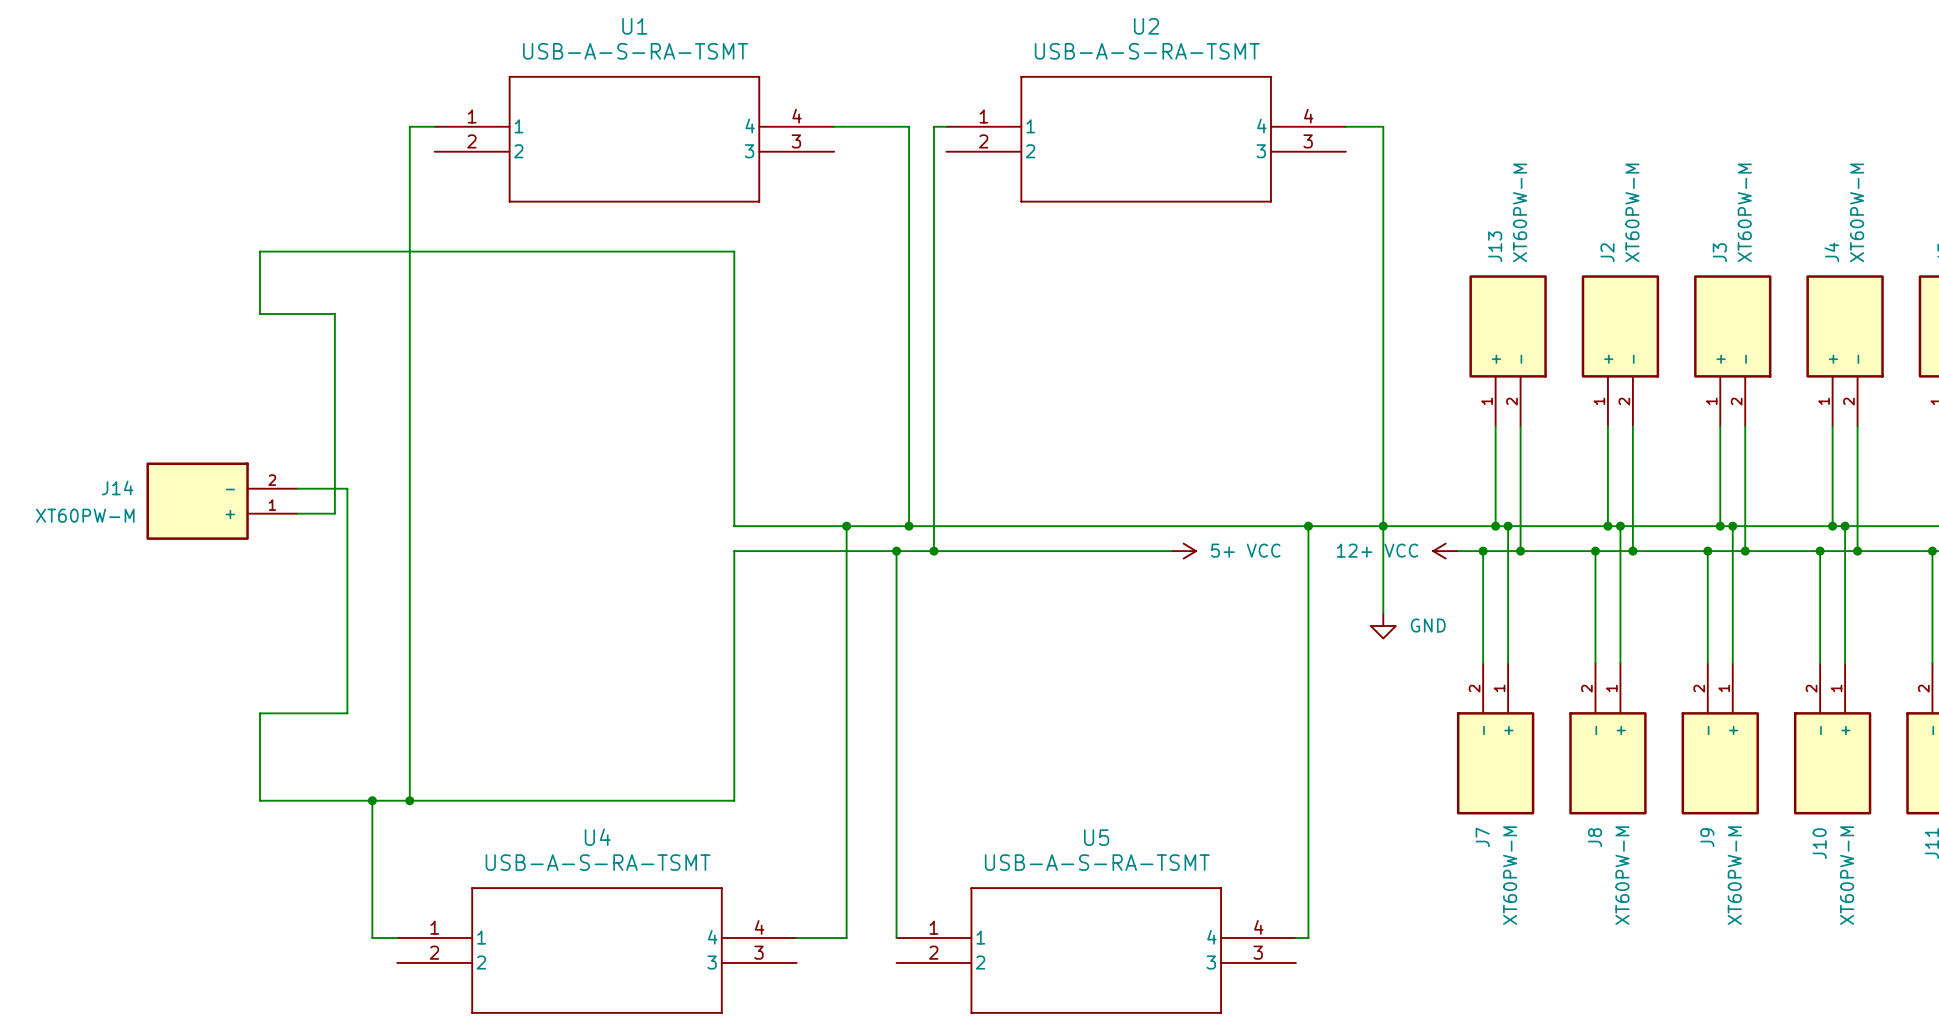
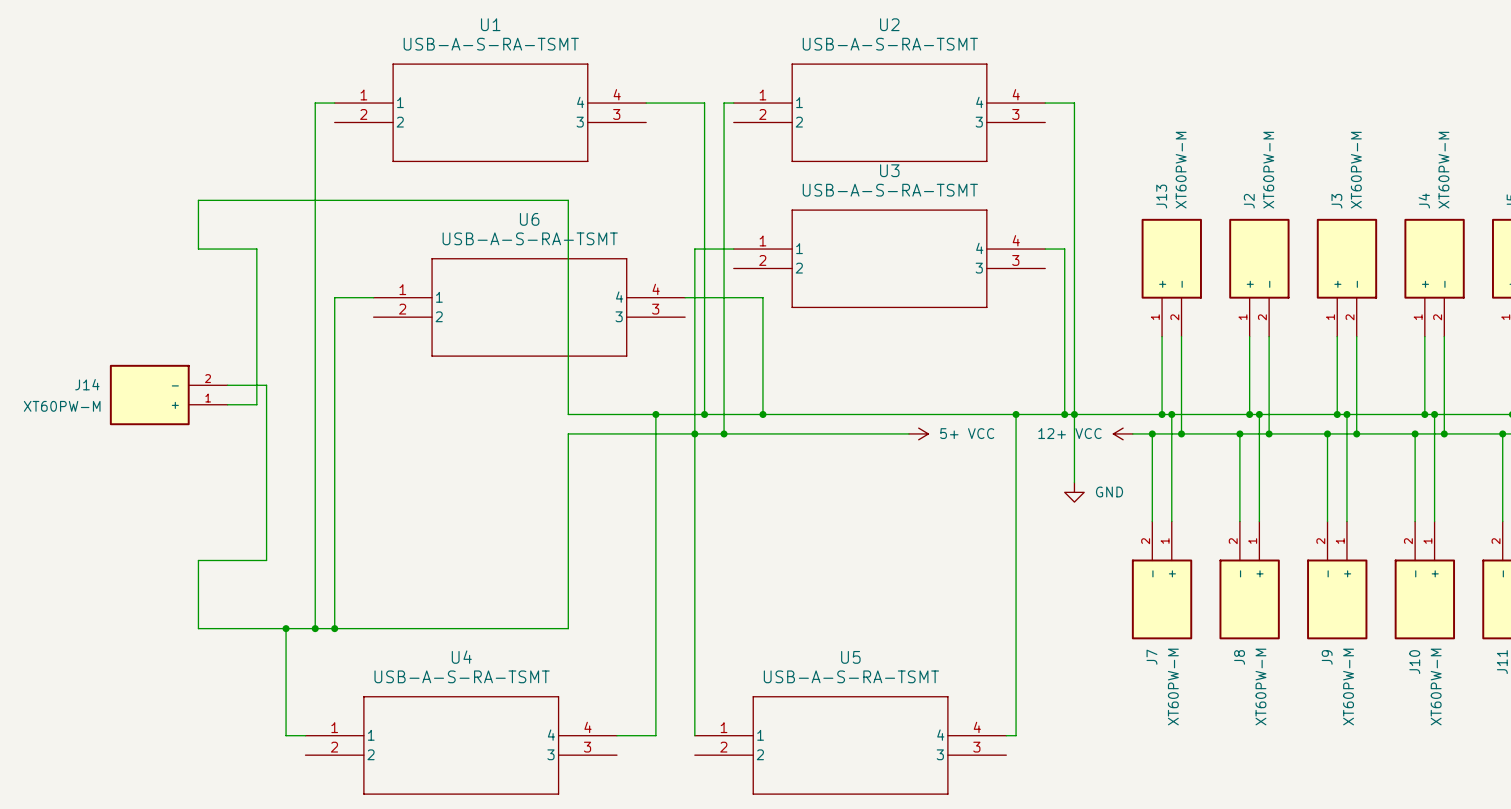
wire: none -> (733, 249) (694, 249) (694, 433)
wire: none -> (1045, 249) (1064, 249) (1064, 414)
U3: none -> USB-A-S-RA-TSMT (889, 258)
wire: none -> (373, 297) (334, 297) (334, 628)
wire: none -> (685, 297) (762, 297) (762, 414)
U6: none -> USB-A-S-RA-TSMT (529, 307)
junction: none -> (762, 414)
junction: none -> (1064, 414)
junction: none -> (334, 628)

